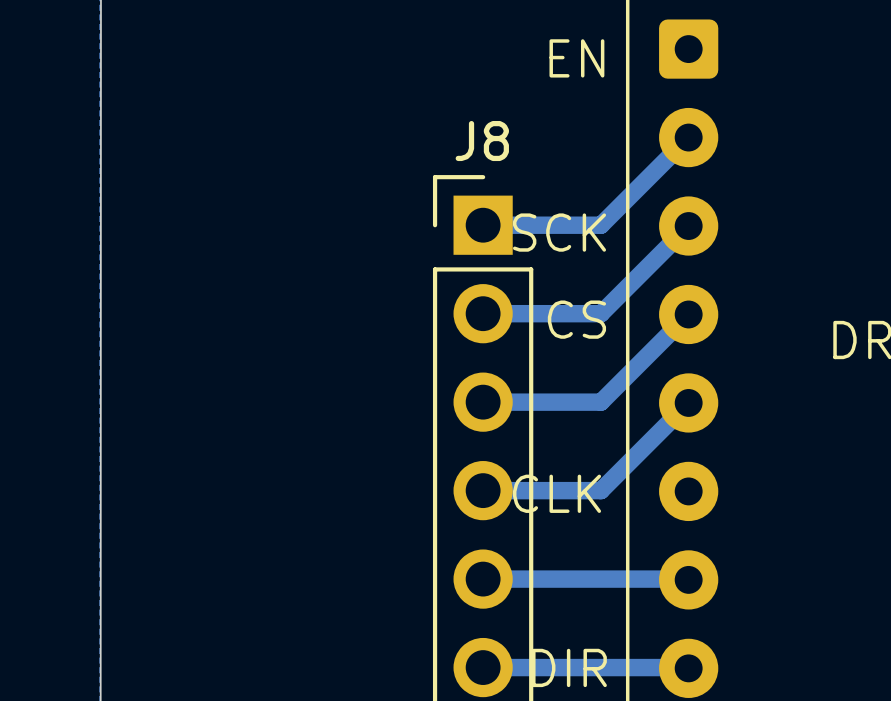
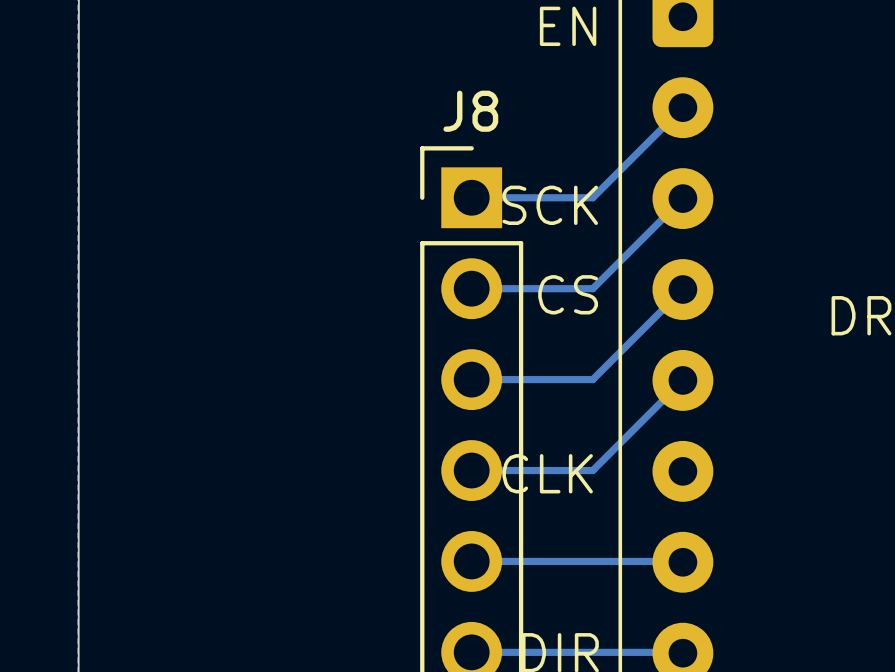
bottom track width: thick (688, 137) (601, 225) (483, 225) -> thin (682, 107) (592, 197) (471, 197)
bottom track width: thick (688, 226) (601, 313) (483, 313) -> thin (682, 198) (592, 288) (471, 288)
bottom track width: thick (688, 314) (601, 402) (483, 402) -> thin (682, 289) (592, 379) (471, 379)
bottom track width: thick (688, 402) (601, 490) (483, 490) -> thin (682, 380) (592, 470) (471, 470)
bottom track width: thick (483, 579) (687, 579) -> thin (471, 561) (682, 561)
bottom track width: thick (483, 667) (687, 667) -> thin (471, 652) (682, 652)

